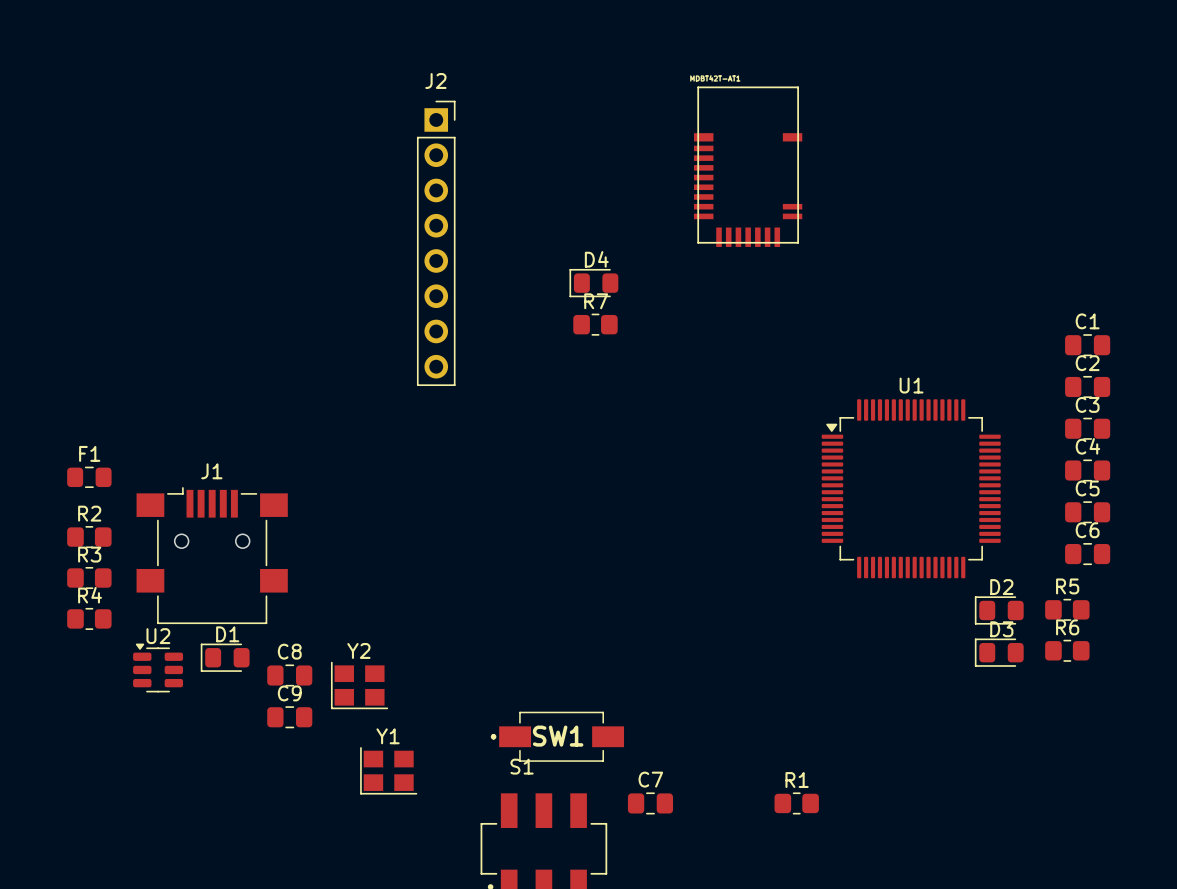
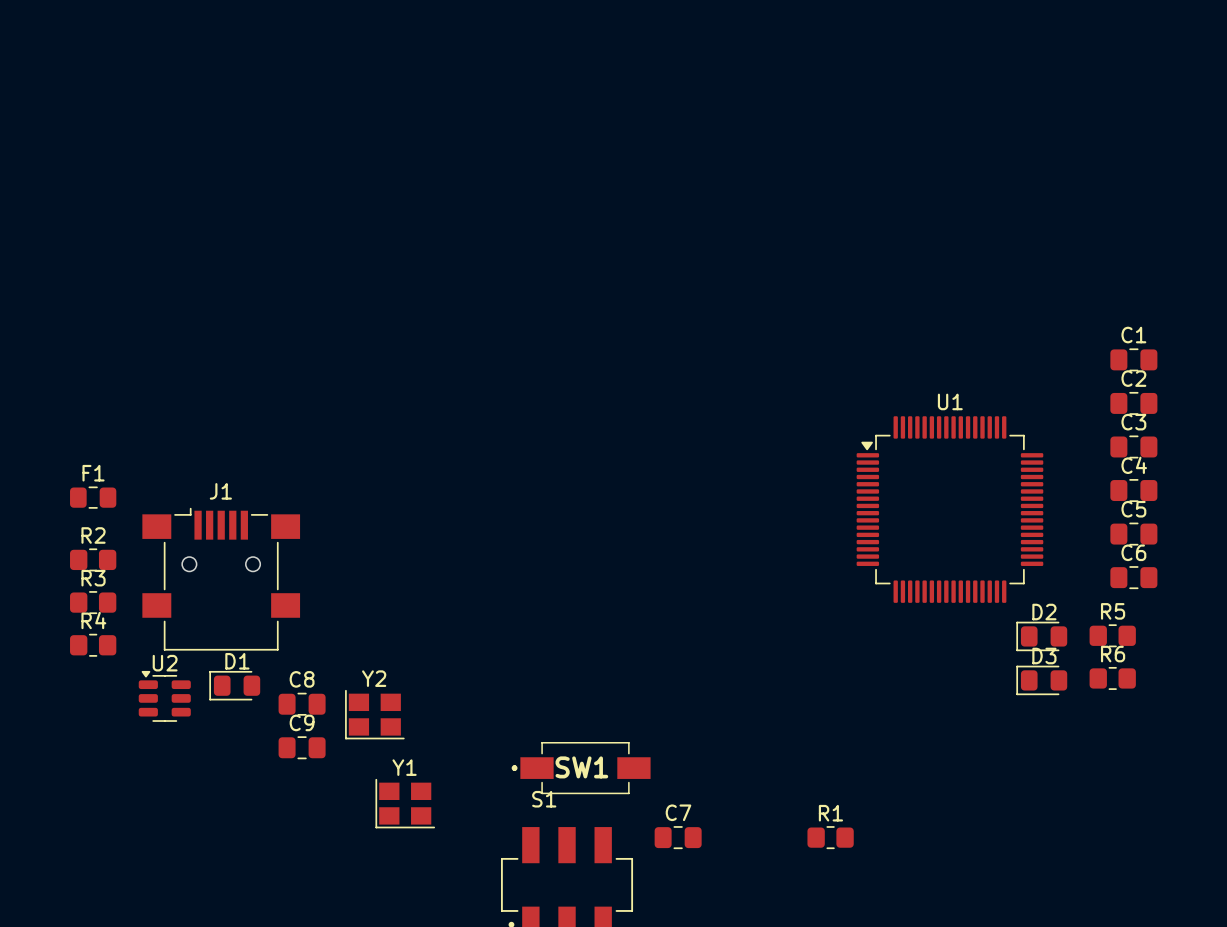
part: (748, 166) -> none
J2: (436, 243) -> none
D4: (593, 283) -> none
R7: (595, 324) -> none

